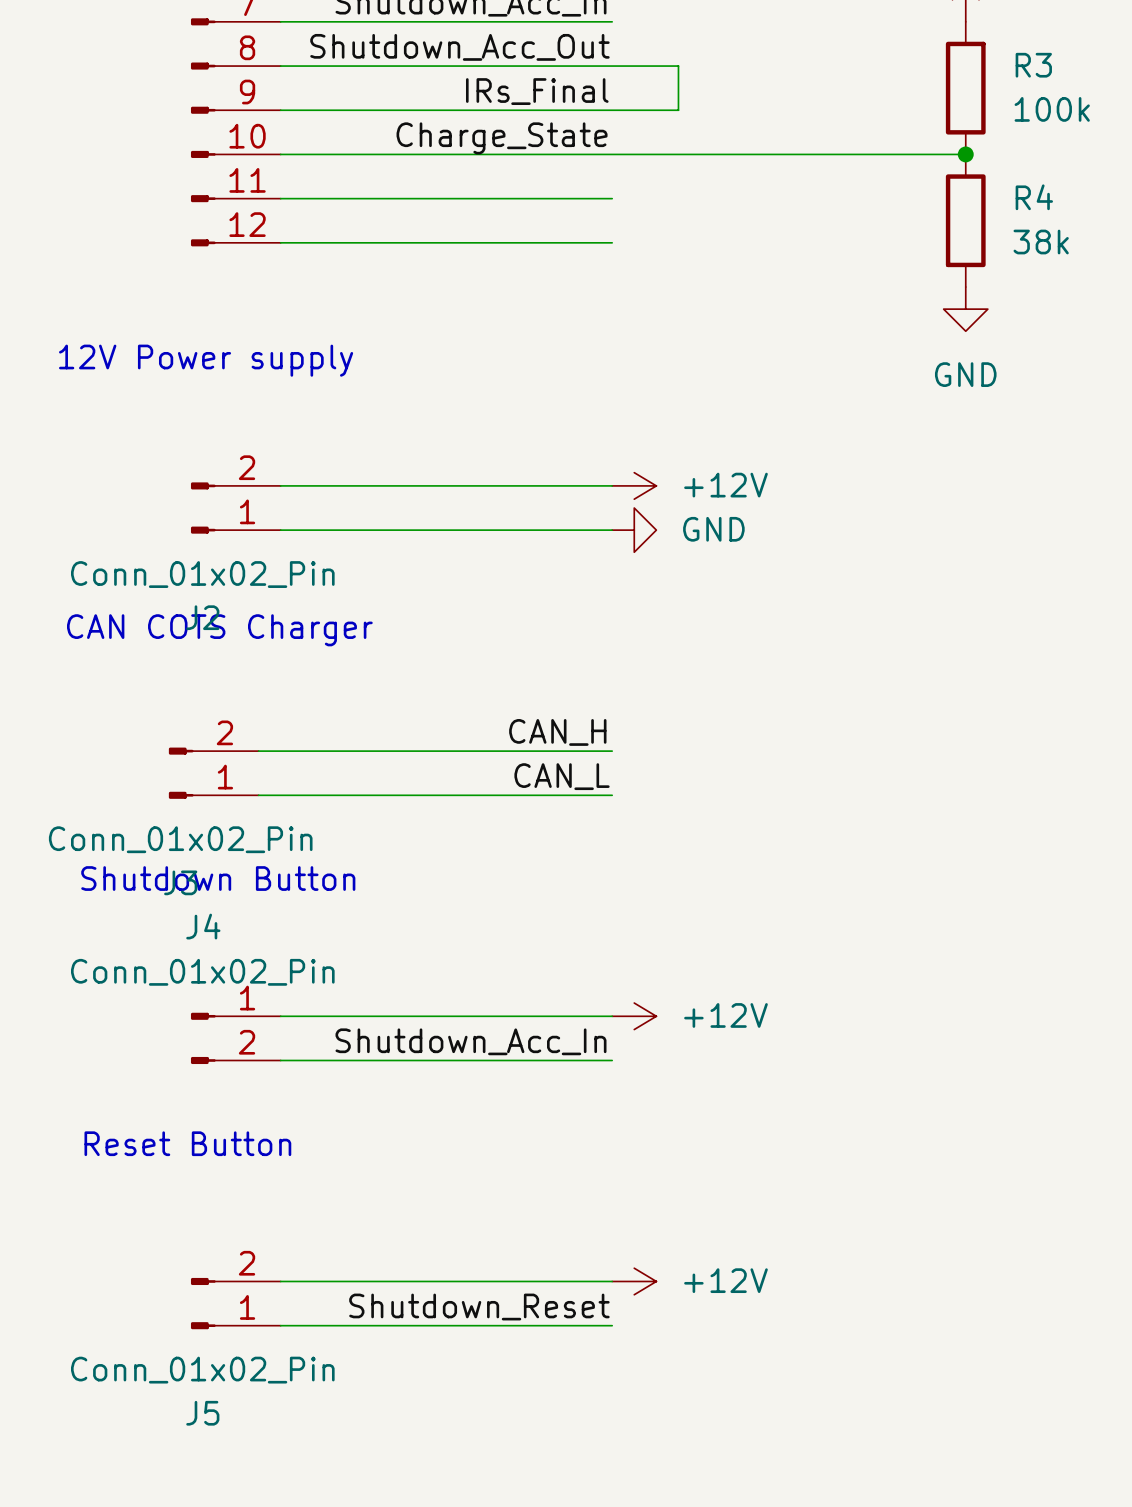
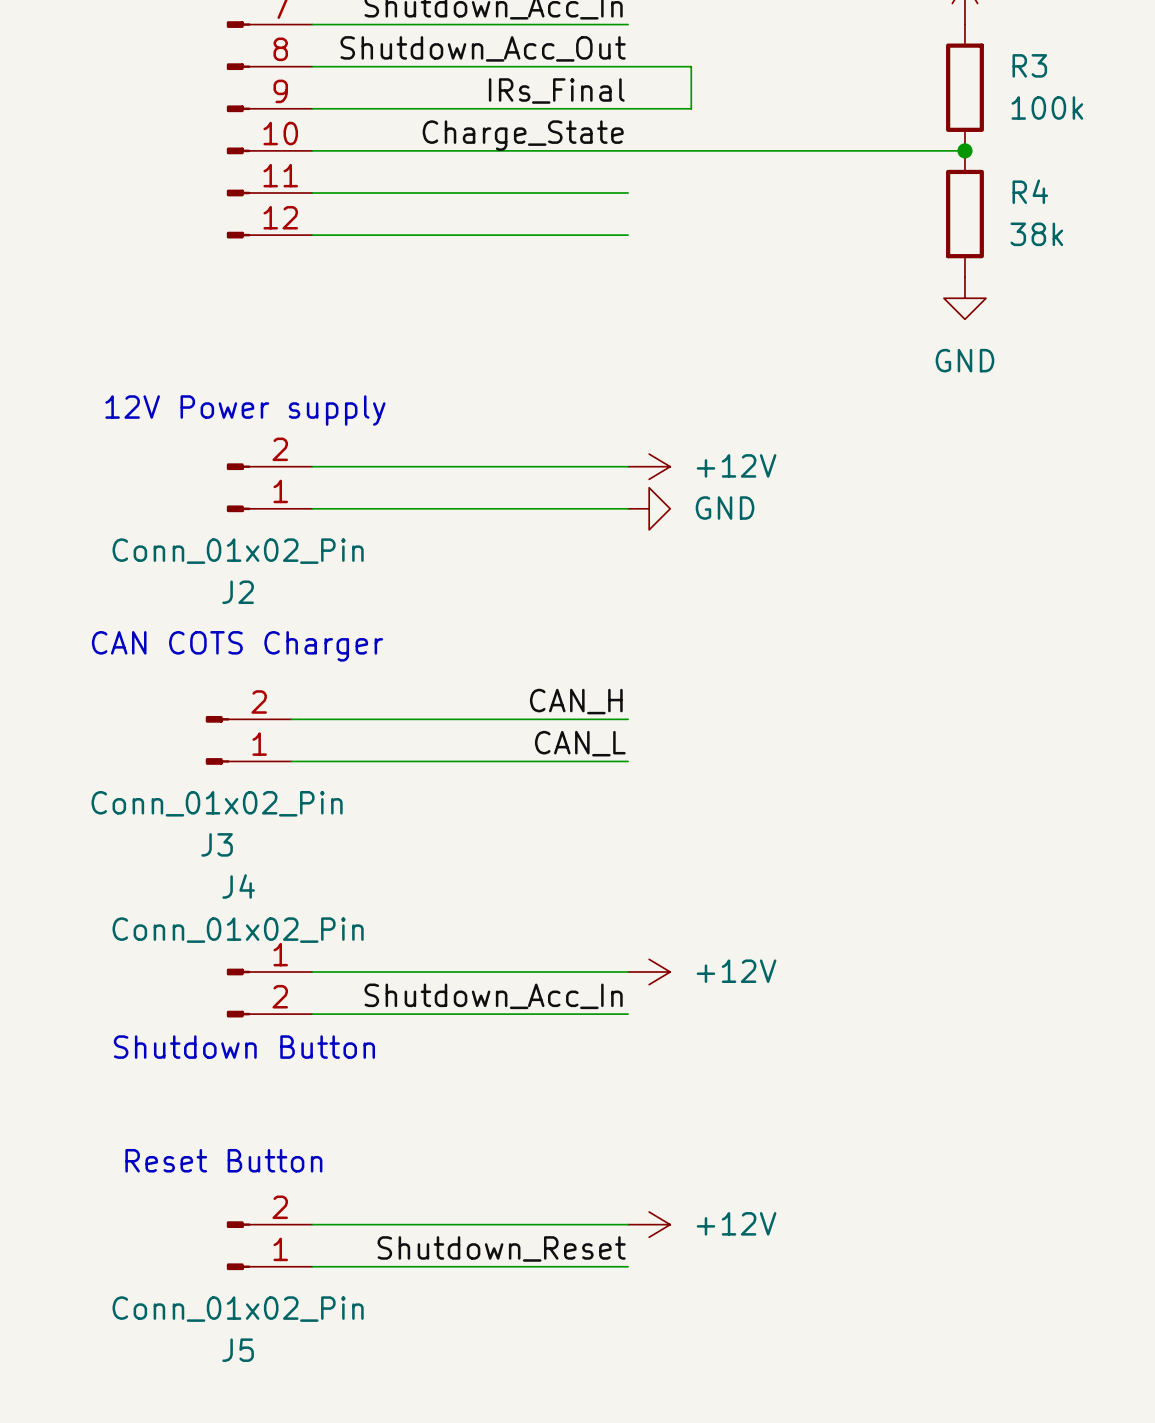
text position: 12V Power supply (206, 360) -> 12V Power supply (245, 410)
text position: CAN COTS Charger (219, 630) -> CAN COTS Charger (237, 646)
text position: Shutdown Button (218, 878) -> Shutdown Button (244, 1047)
text position: Reset Button (187, 1143) -> Reset Button (223, 1160)

